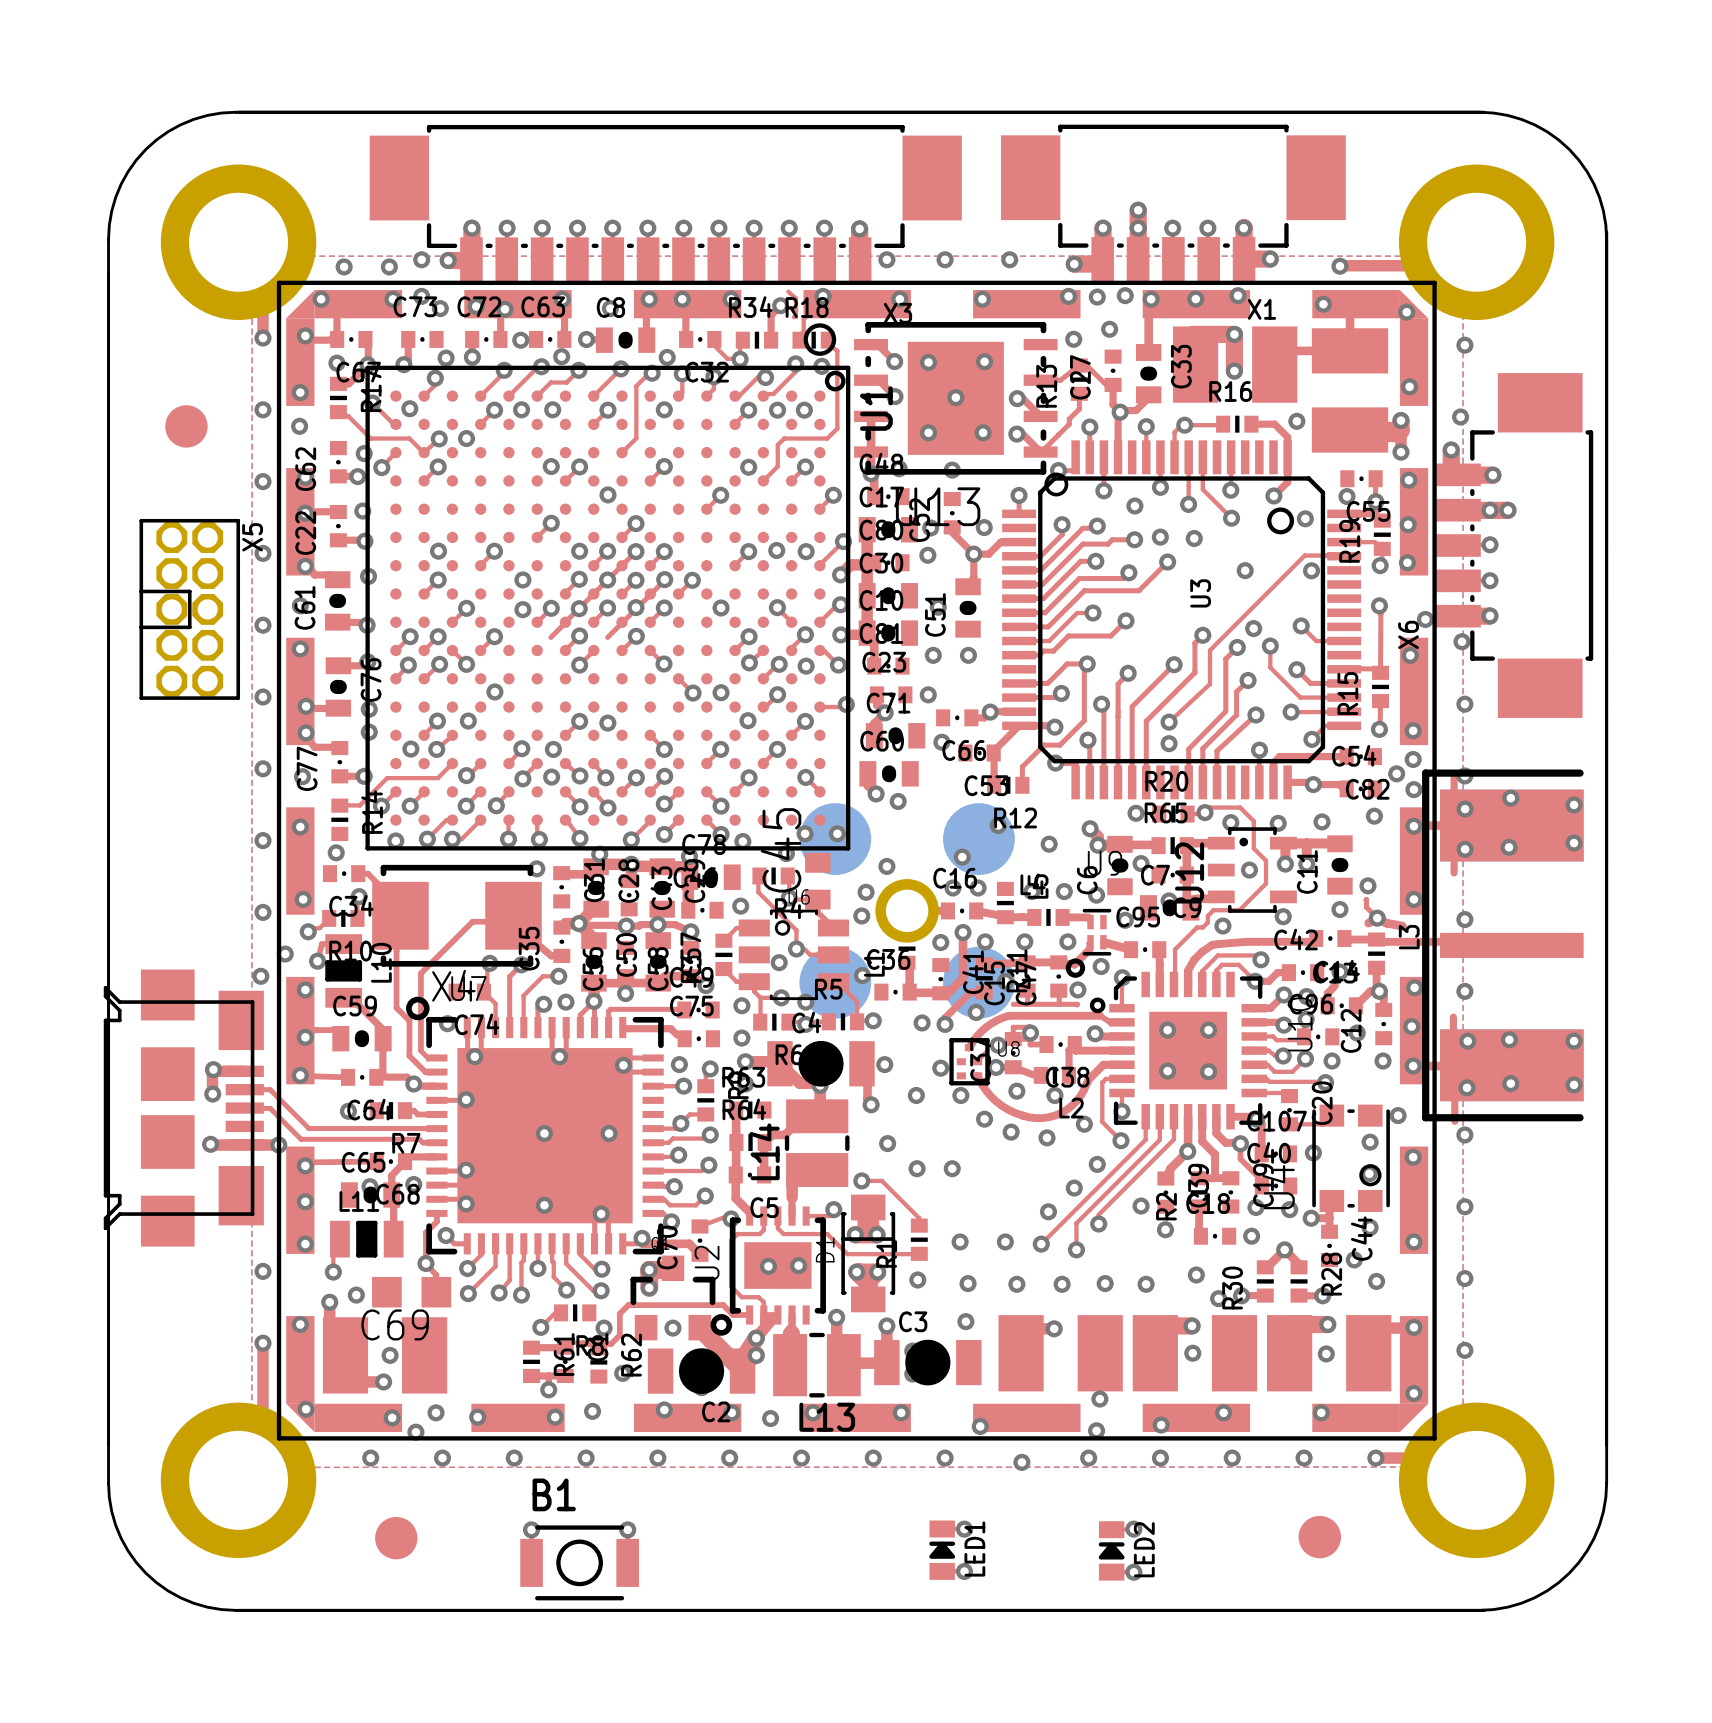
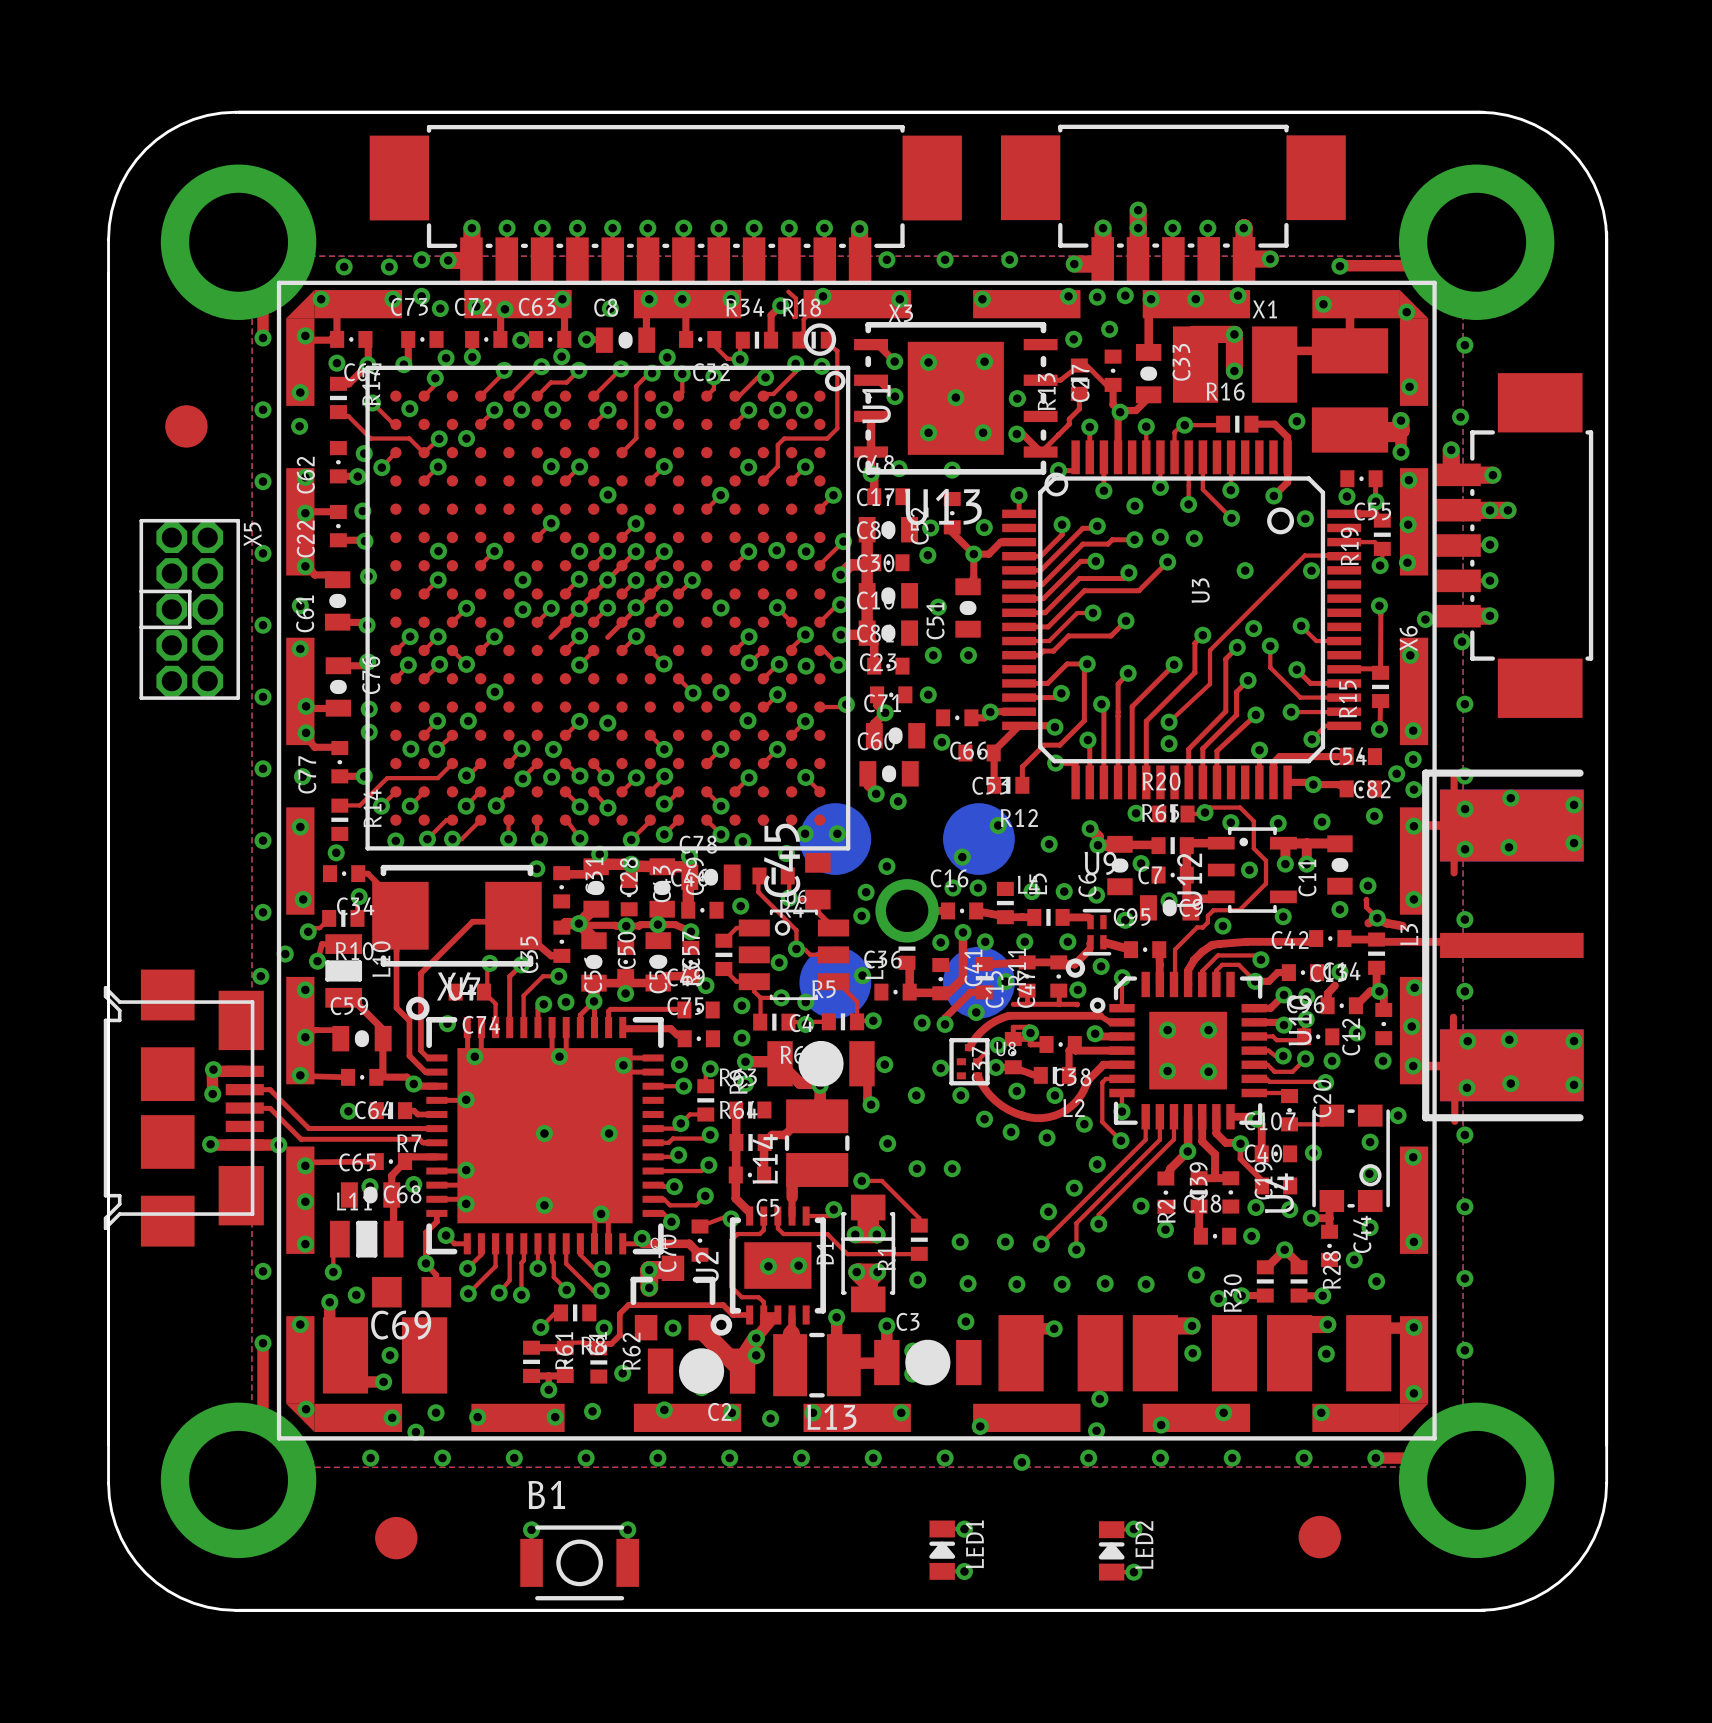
top track: (1022, 398) (1040, 416) -> none

